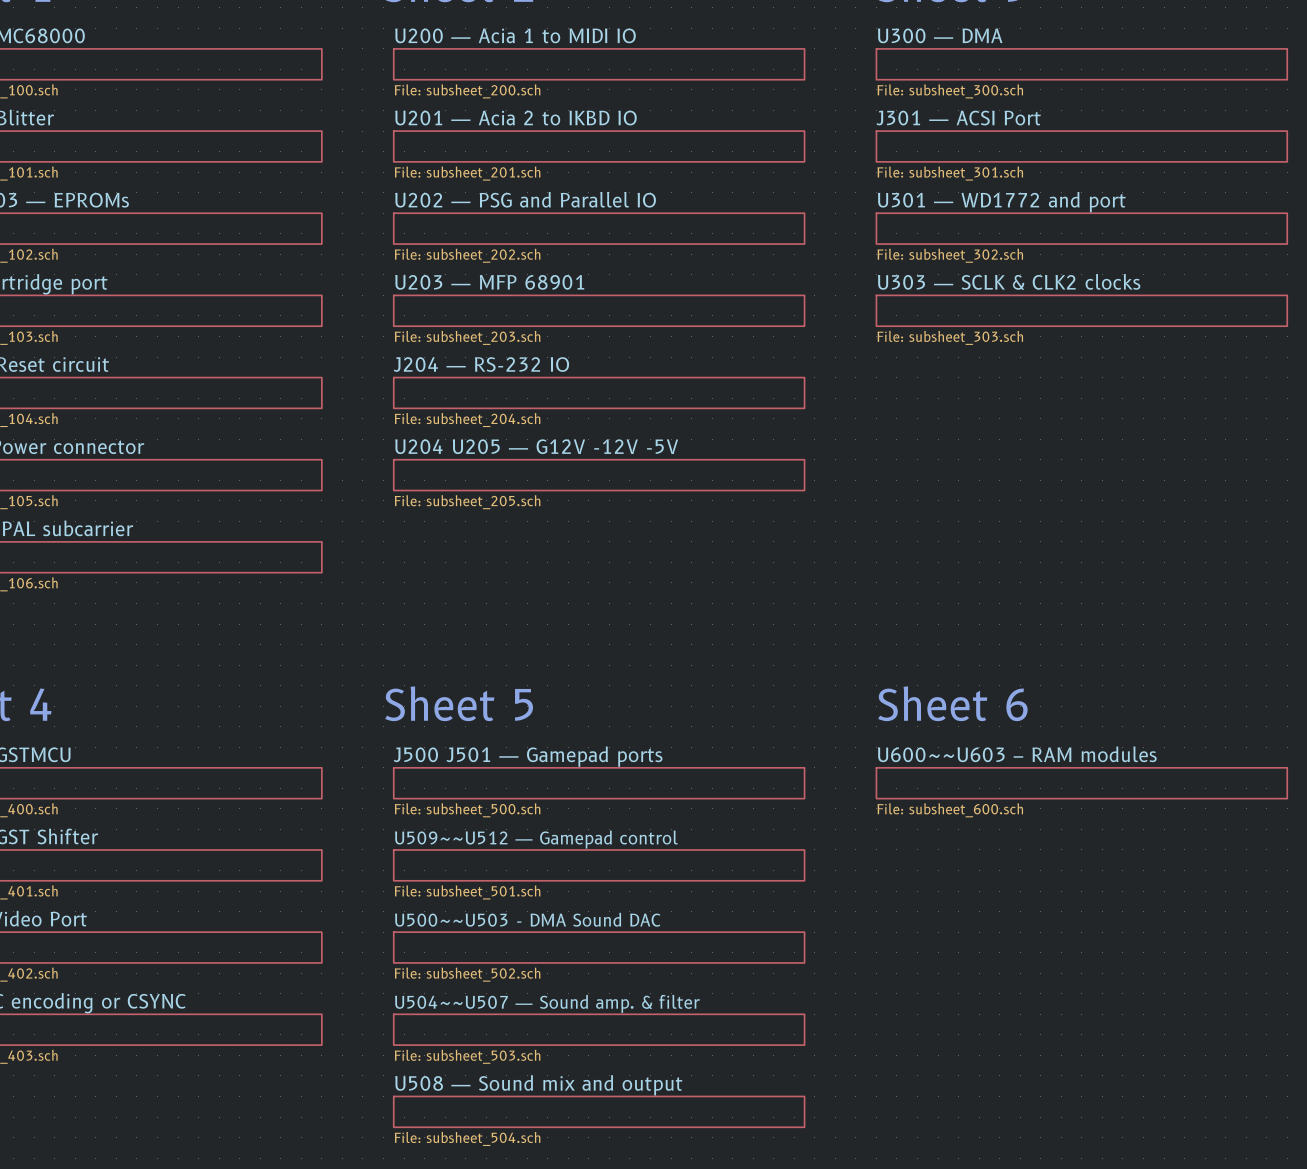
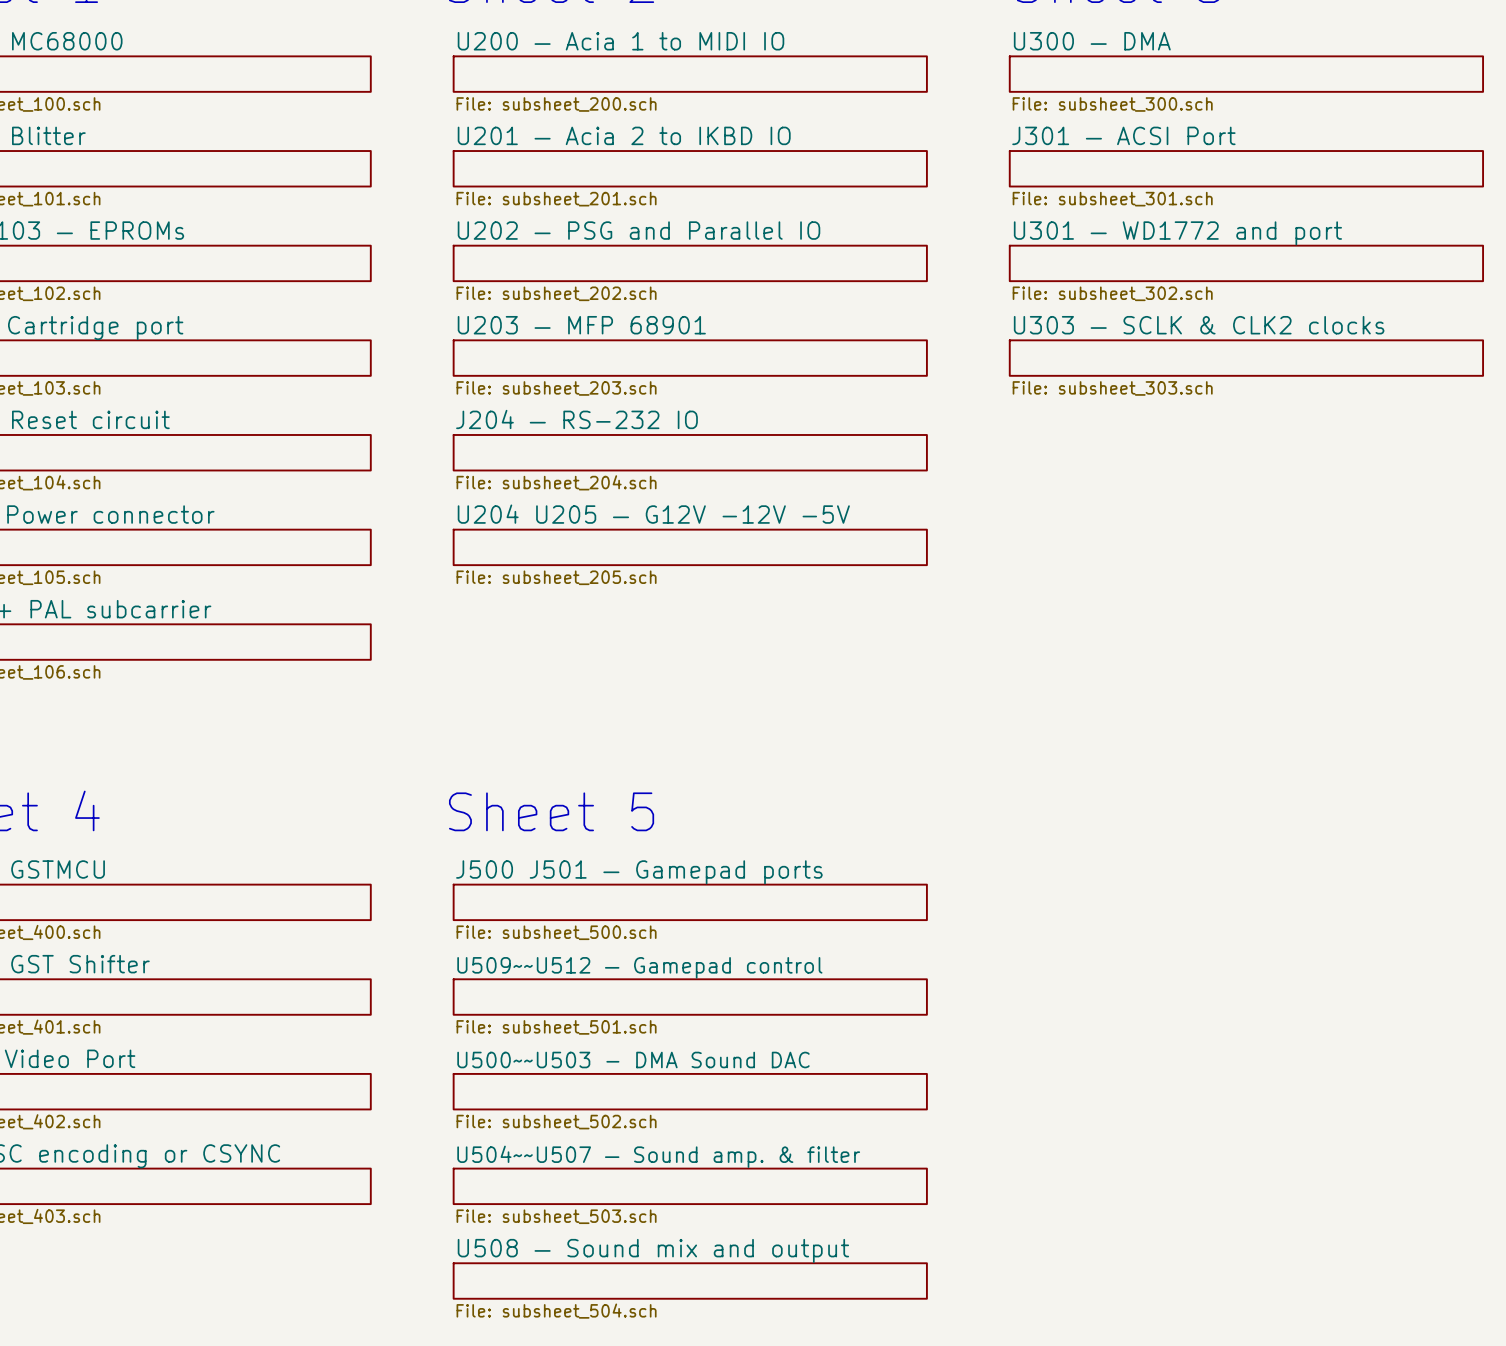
text: Sheet 6 (952, 703) -> none
sheet U600~~U603 – RAM modules: File: subsheet_600.sch (1081, 783) -> none

